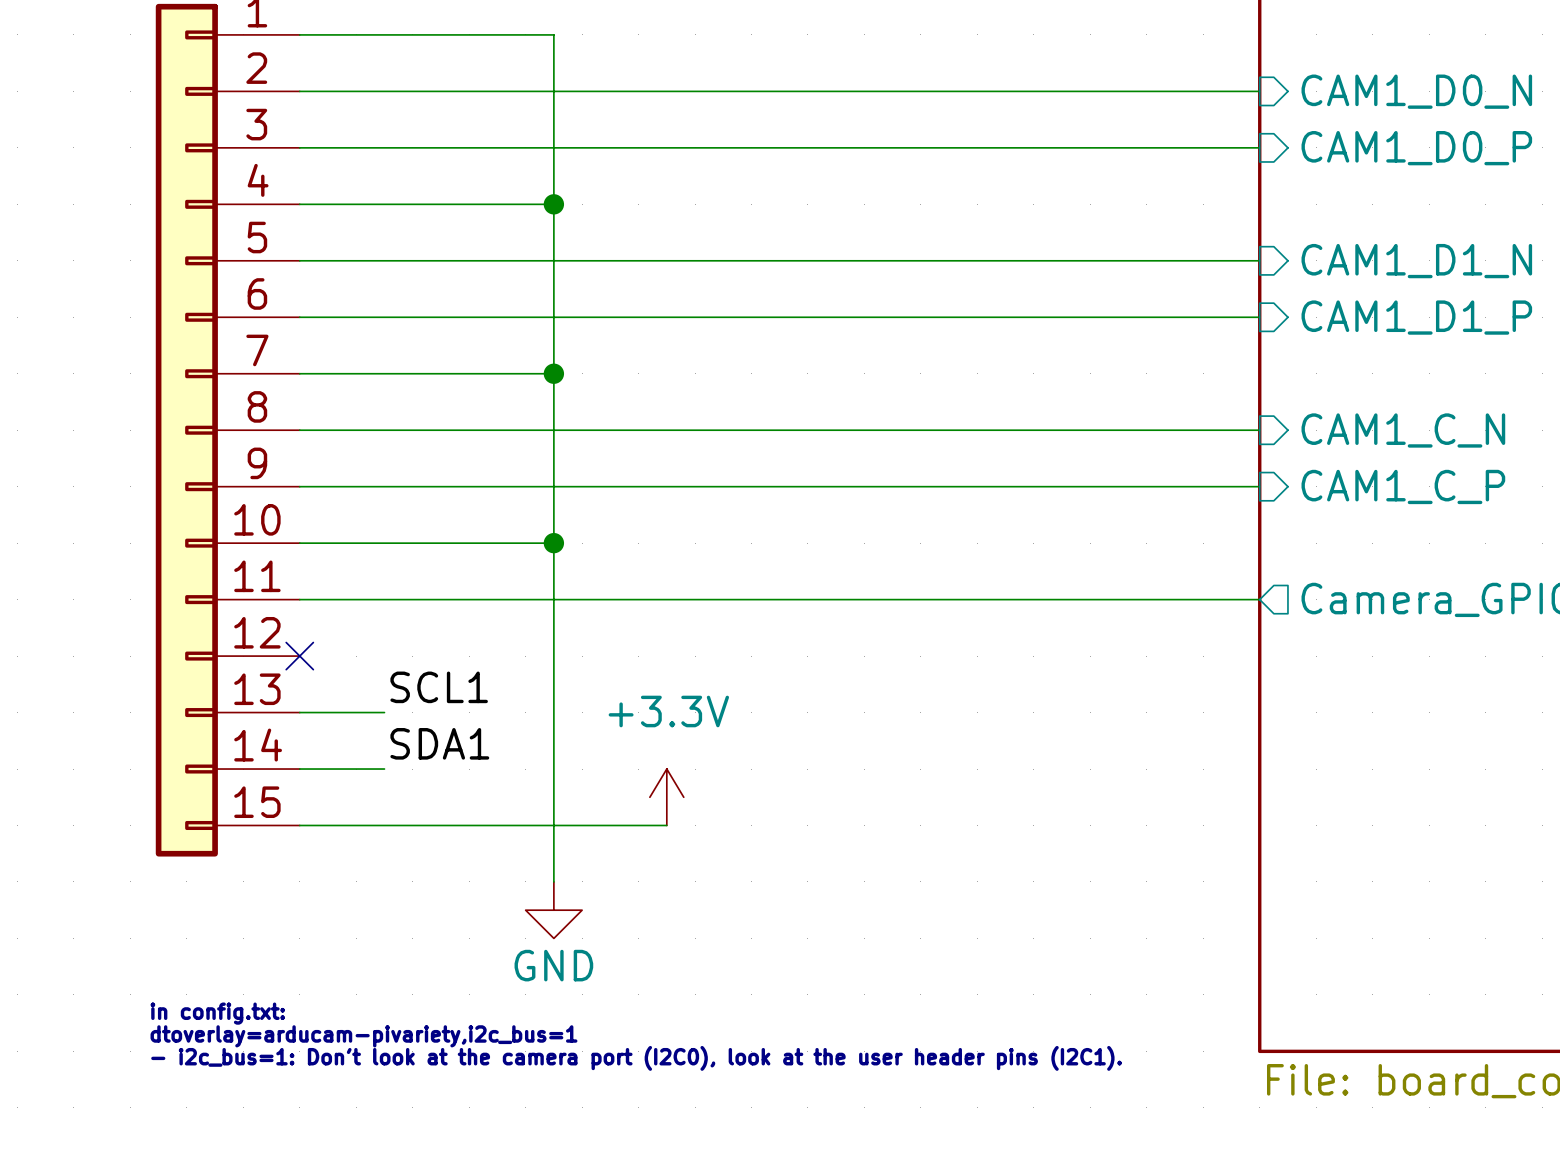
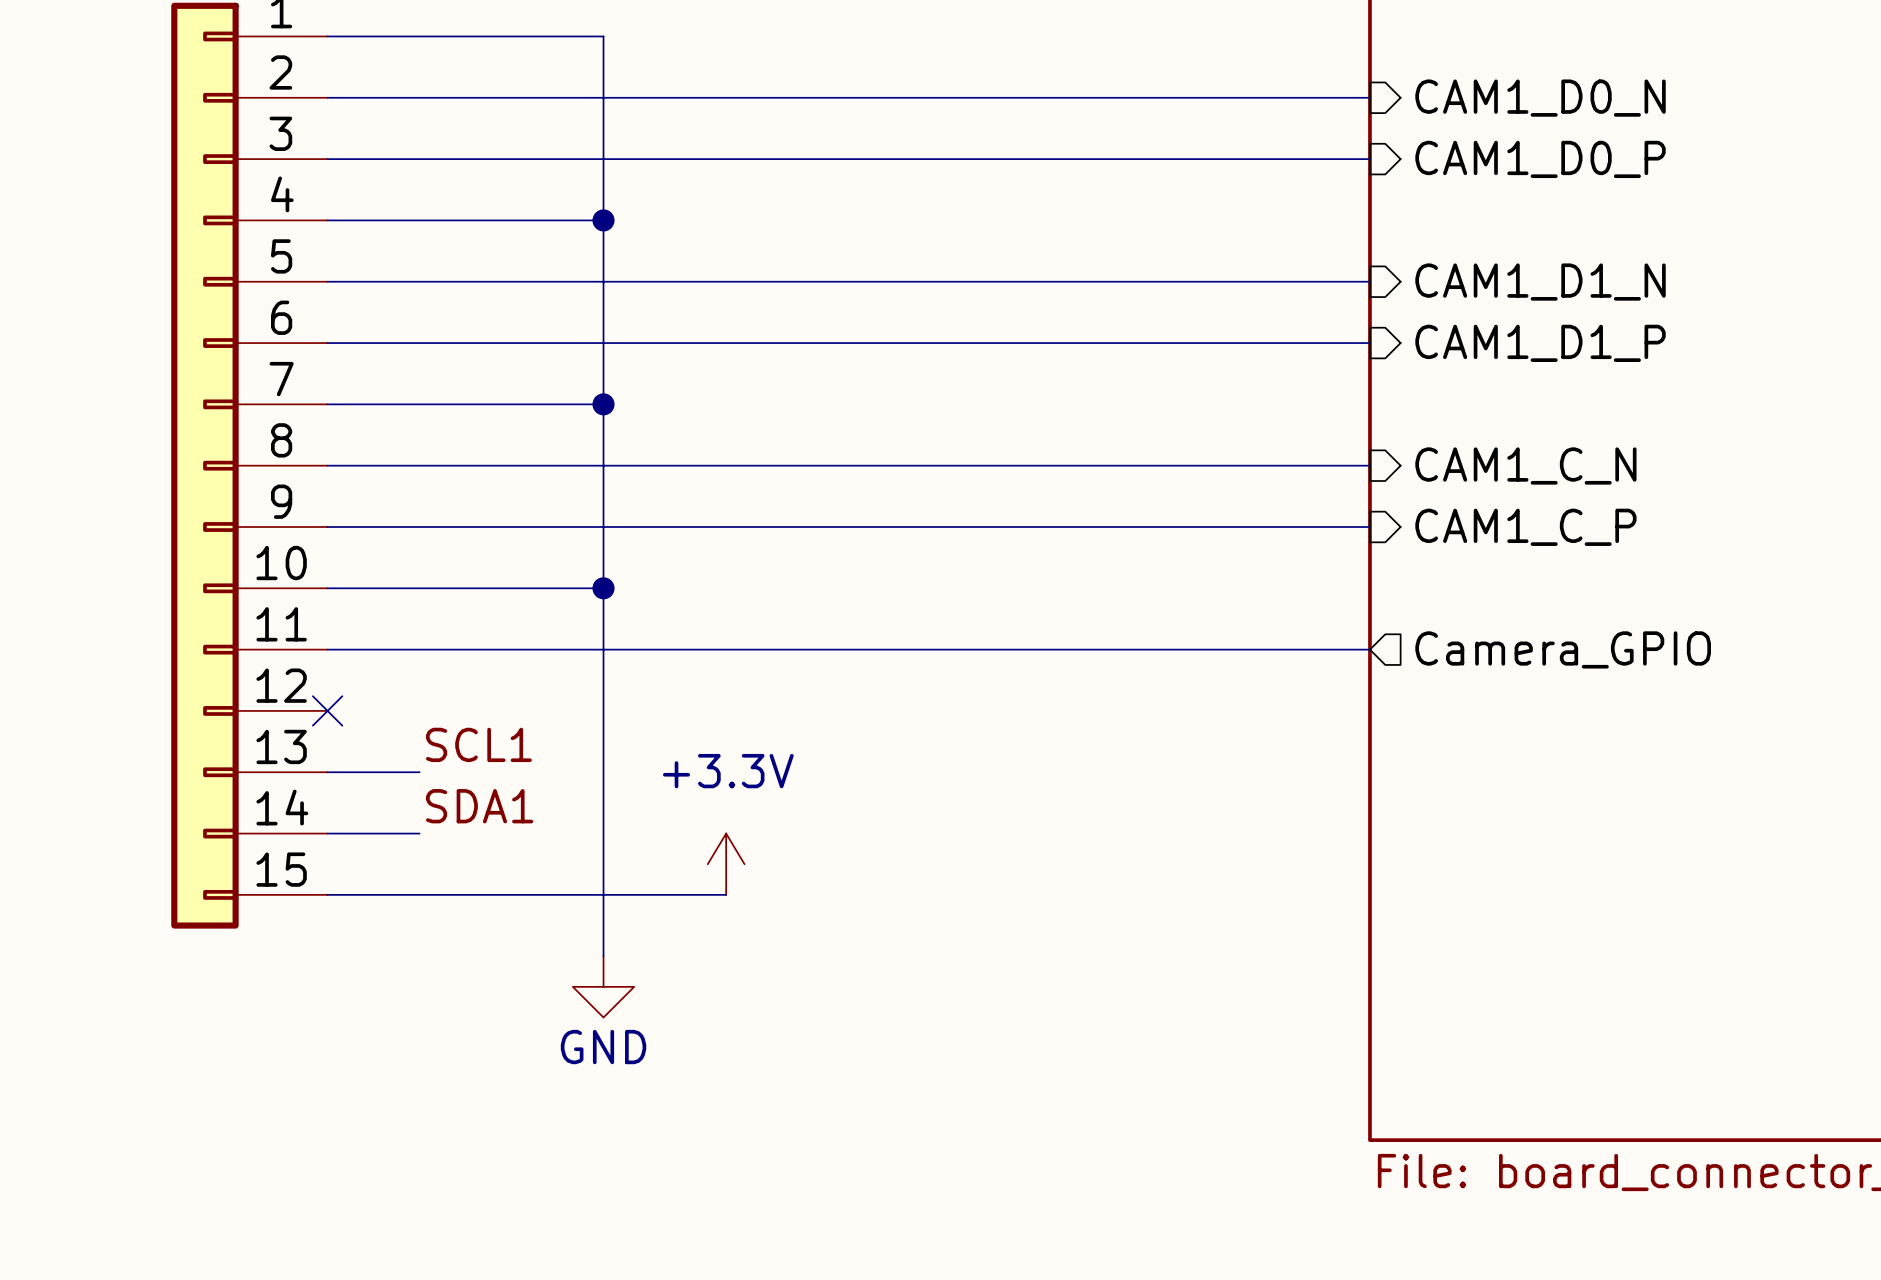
text: in config.txt: (217, 1013) -> none
text: dtoverlay=arducam-pivariety,i2c_bus=1 (363, 1036) -> none
text: - i2c_bus=1: Don't look at the camera port (I2C0), look at the user header pins (I2C1). (636, 1058) -> none

